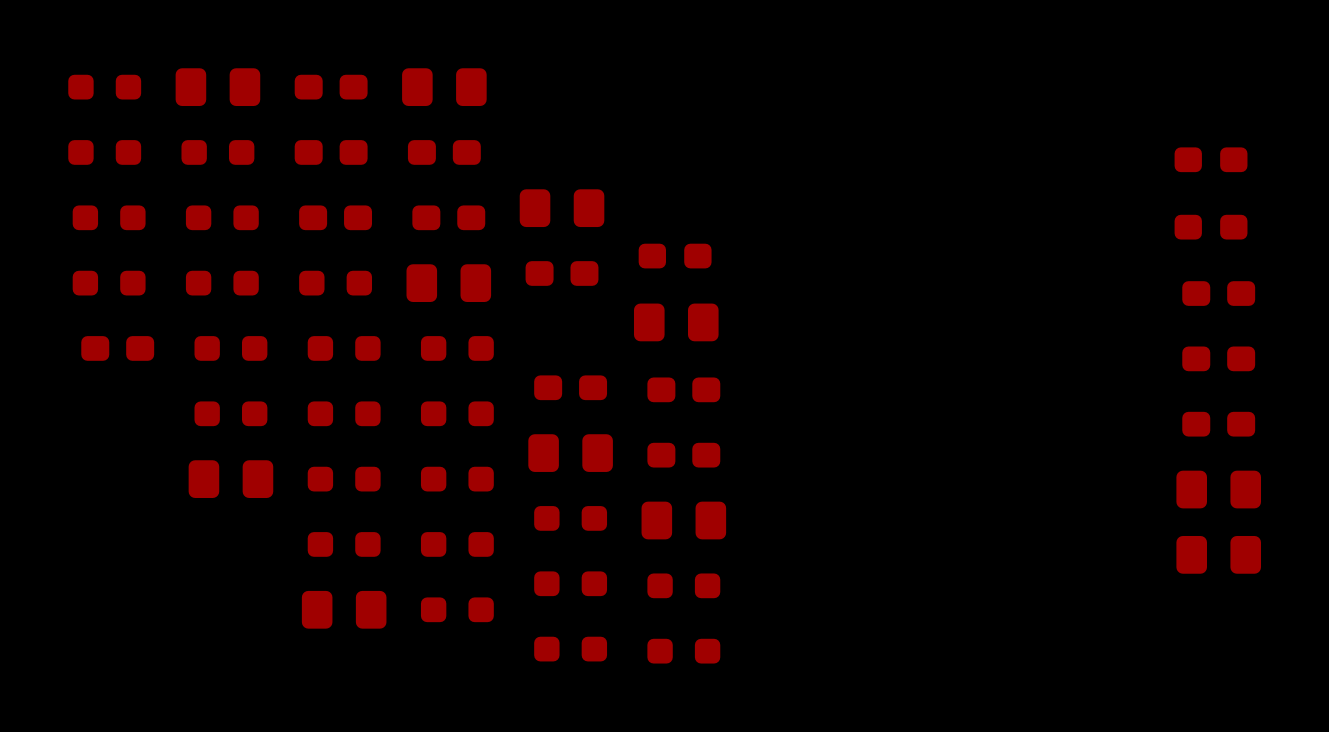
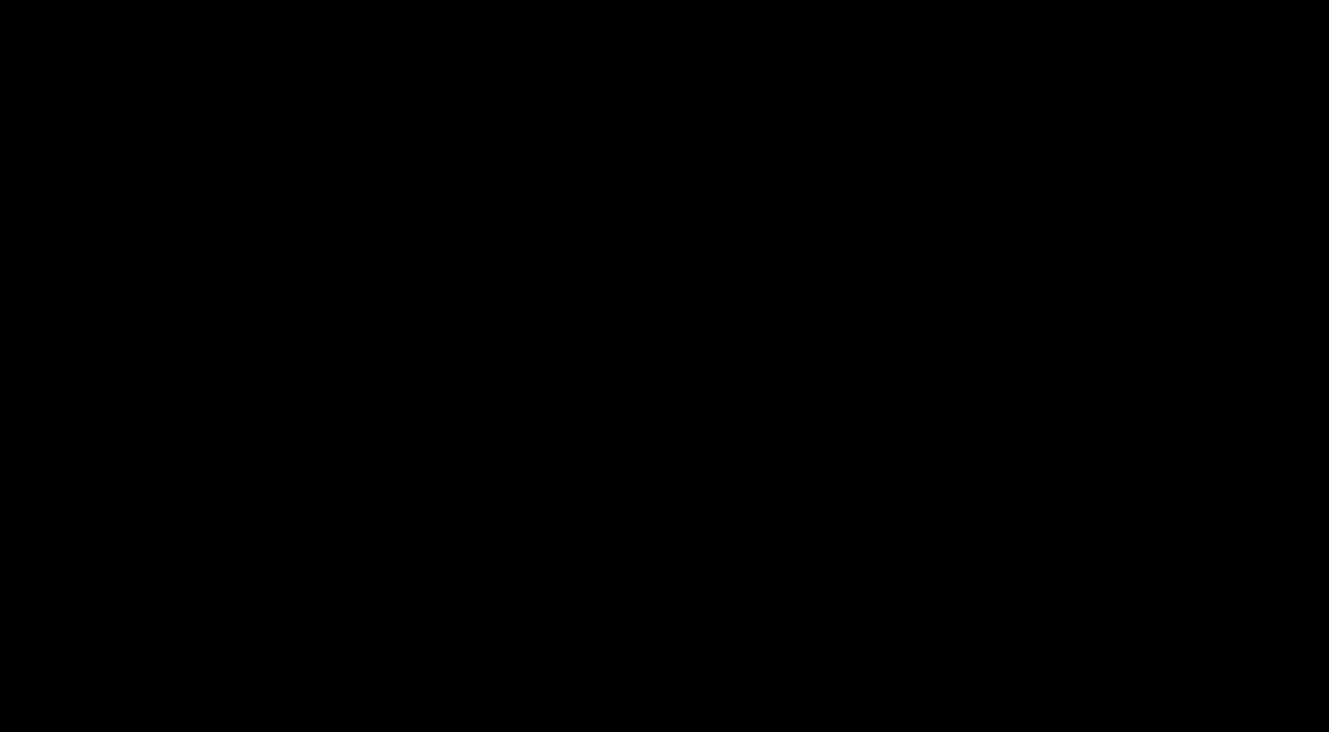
part: (104, 87) -> none
part: (217, 87) -> none
part: (331, 87) -> none
part: (444, 87) -> none
part: (104, 152) -> none
part: (217, 152) -> none
part: (331, 152) -> none
part: (444, 152) -> none
part: (1211, 159) -> none
part: (562, 208) -> none
part: (109, 217) -> none
part: (222, 217) -> none
part: (335, 217) -> none
part: (448, 217) -> none
part: (1211, 227) -> none
part: (675, 256) -> none
part: (562, 273) -> none
part: (109, 283) -> none
part: (222, 283) -> none
part: (335, 283) -> none
part: (448, 283) -> none
part: (1218, 293) -> none
part: (676, 322) -> none
part: (117, 348) -> none
part: (230, 348) -> none
part: (344, 348) -> none
part: (457, 348) -> none
part: (1218, 358) -> none
part: (570, 387) -> none
part: (683, 389) -> none
part: (230, 413) -> none
part: (344, 413) -> none
part: (457, 413) -> none
part: (1218, 424) -> none
part: (570, 453) -> none
part: (683, 455) -> none
part: (230, 479) -> none
part: (344, 479) -> none
part: (457, 479) -> none
part: (1218, 489) -> none
part: (570, 518) -> none
part: (683, 520) -> none
part: (344, 544) -> none
part: (457, 544) -> none
part: (1218, 554) -> none
part: (570, 583) -> none
part: (683, 585) -> none
part: (344, 609) -> none
part: (457, 609) -> none
part: (570, 649) -> none
part: (683, 651) -> none

